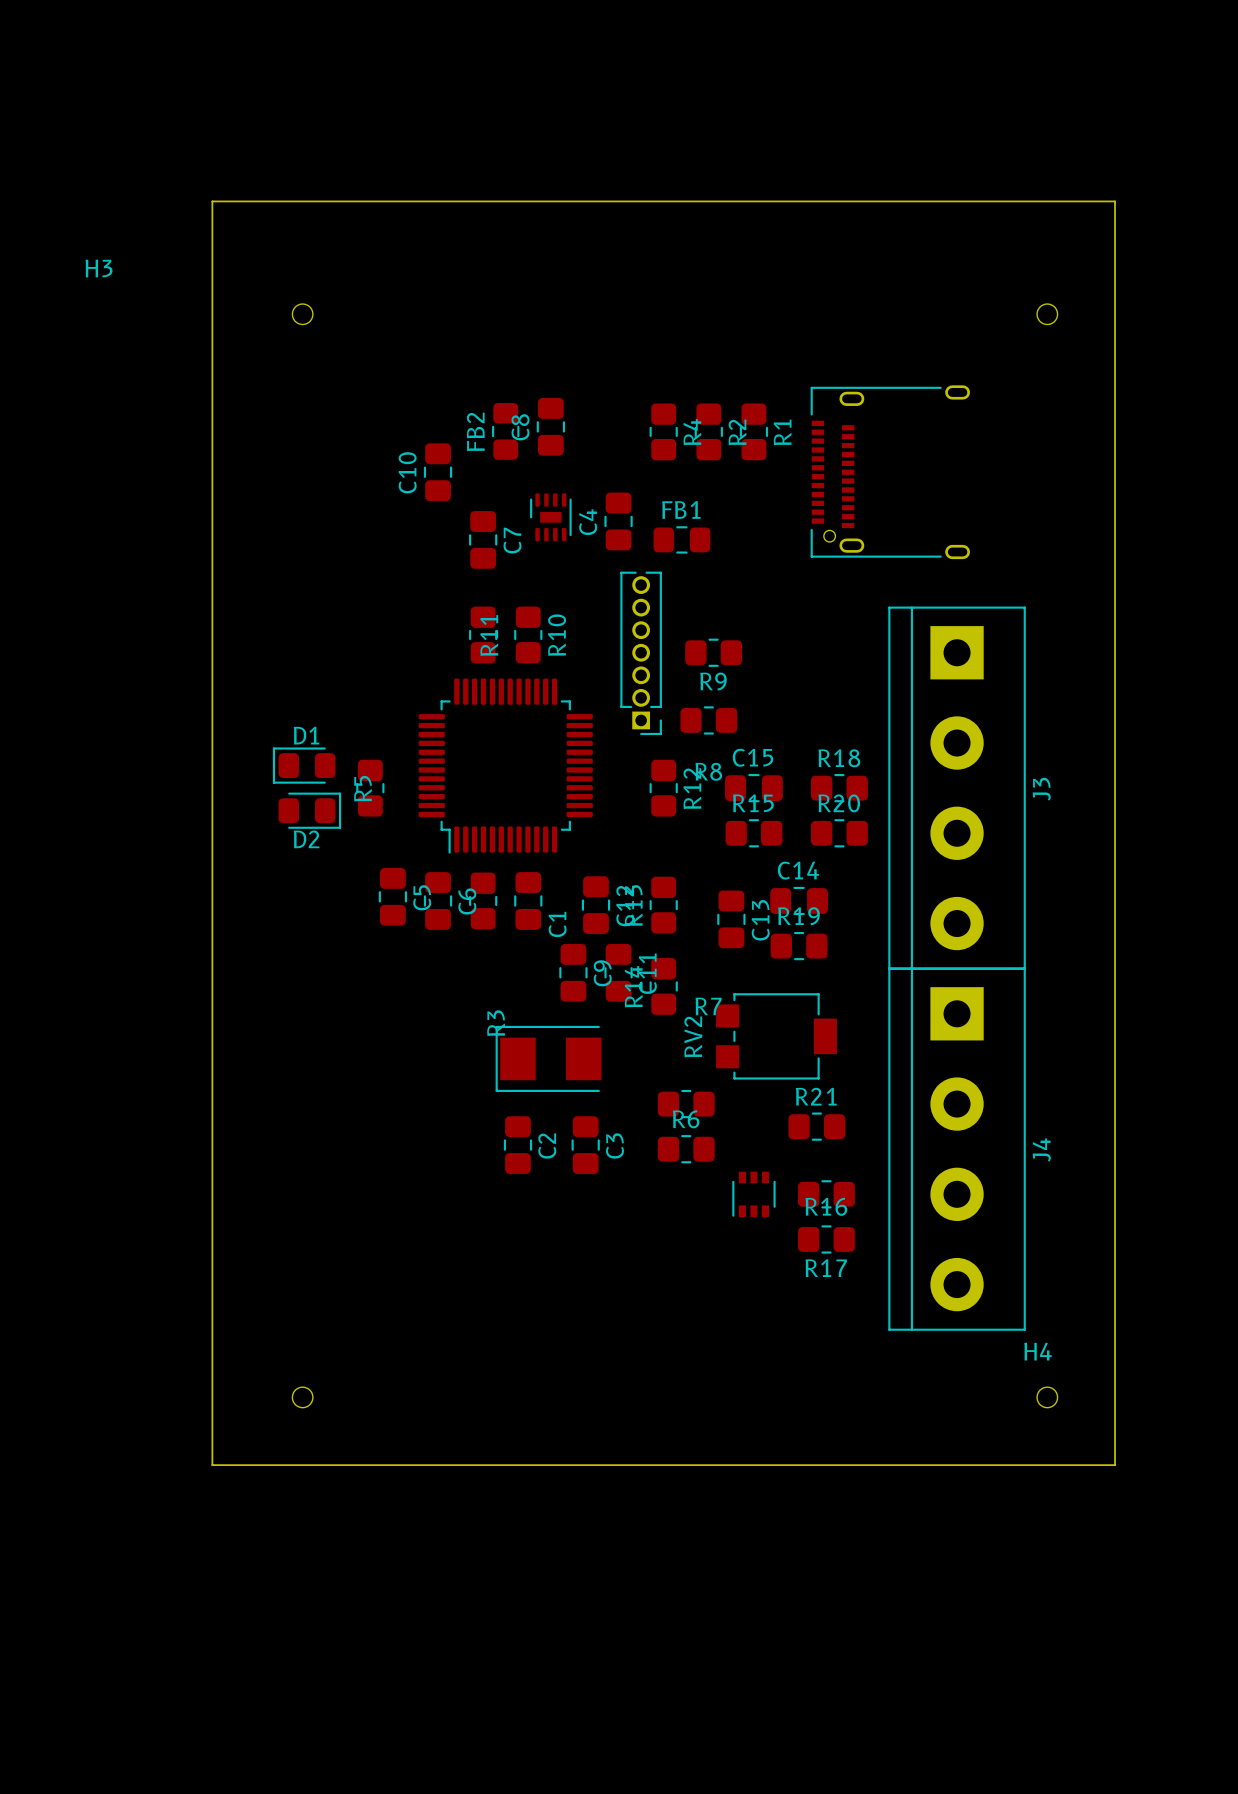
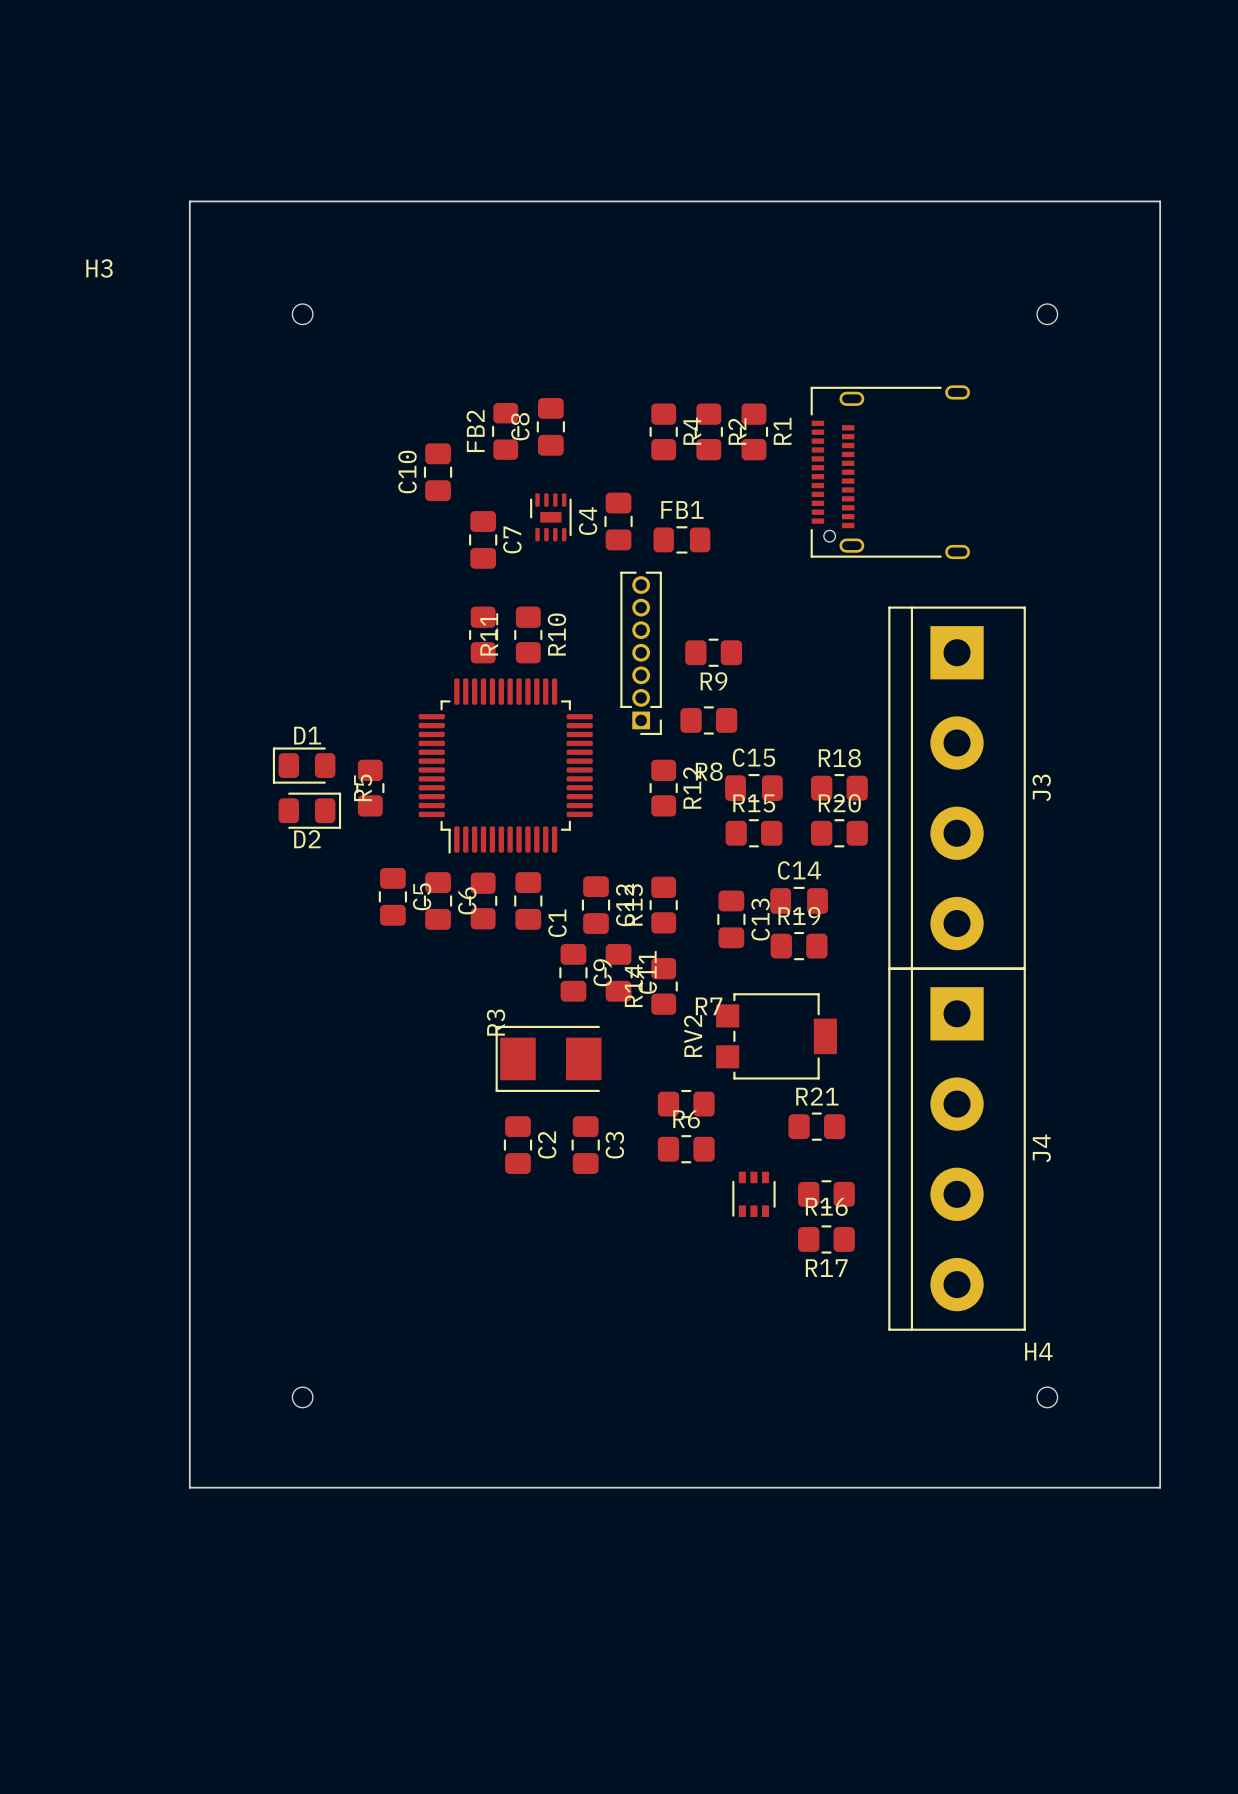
board edge: (212, 201) (212, 1465) (1115, 1465) (1115, 201) -> (212, 201) (189, 201) (189, 1487) (1160, 1487) (1160, 201) (1115, 201)

